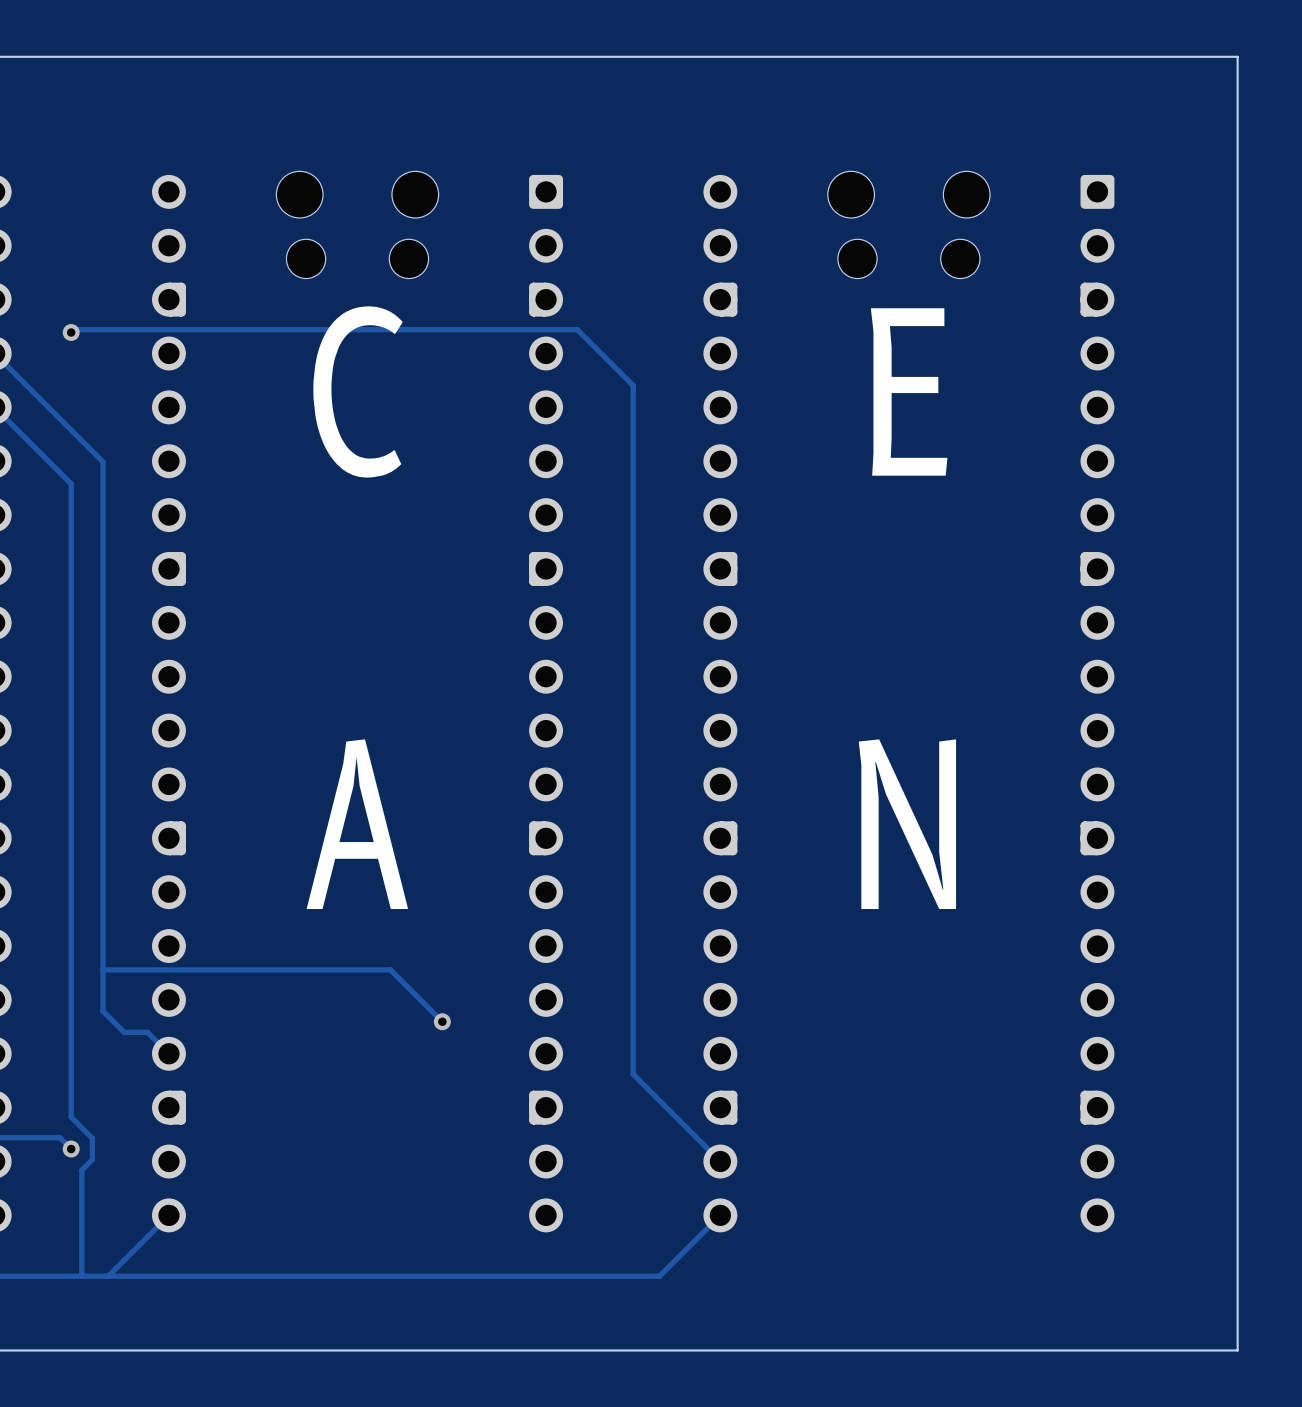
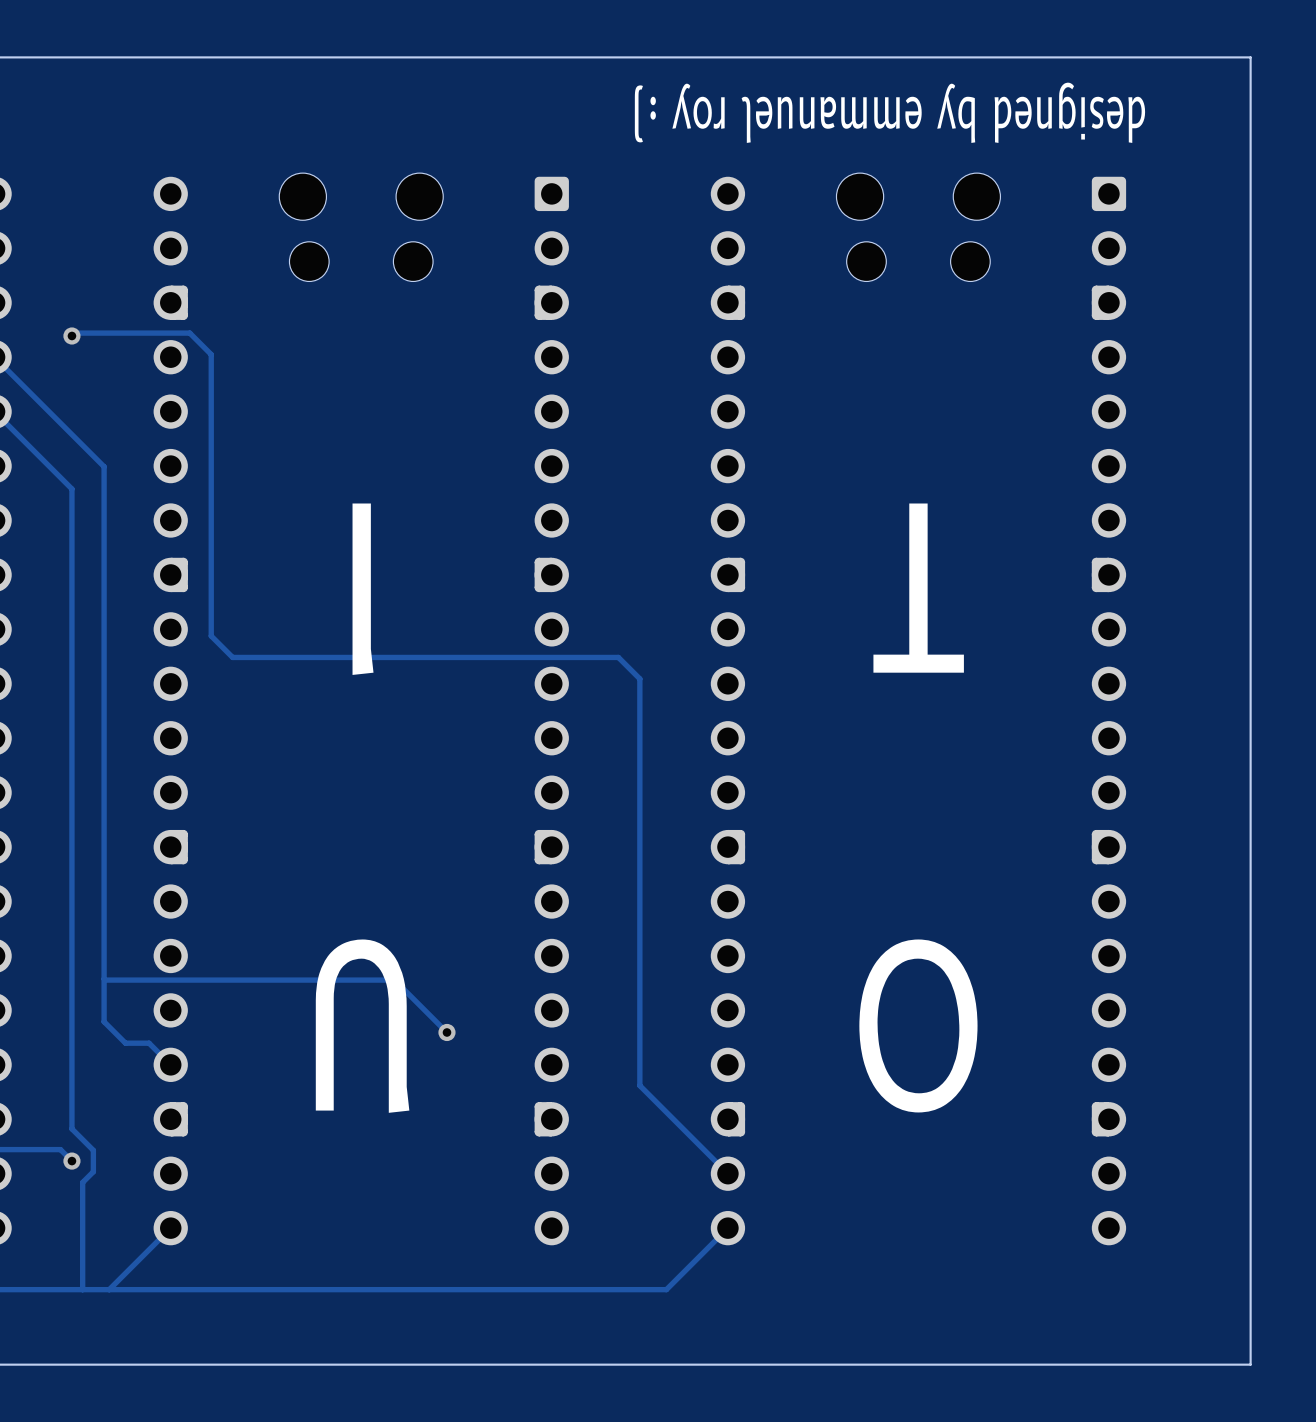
text: none -> designed by emmanuel roy :) (889, 112)
track: (187, 329) (577, 329) (633, 385) (633, 671) -> (189, 333) (211, 354) (211, 636) (232, 657) (618, 657) (639, 678)
text: C (358, 391) -> none
text: E (909, 391) -> none
text: none -> T (918, 588)
text: none -> I (363, 589)
text: A (357, 824) -> none
text: N (907, 824) -> none
text: none -> U (362, 1026)
text: none -> O (918, 1025)

